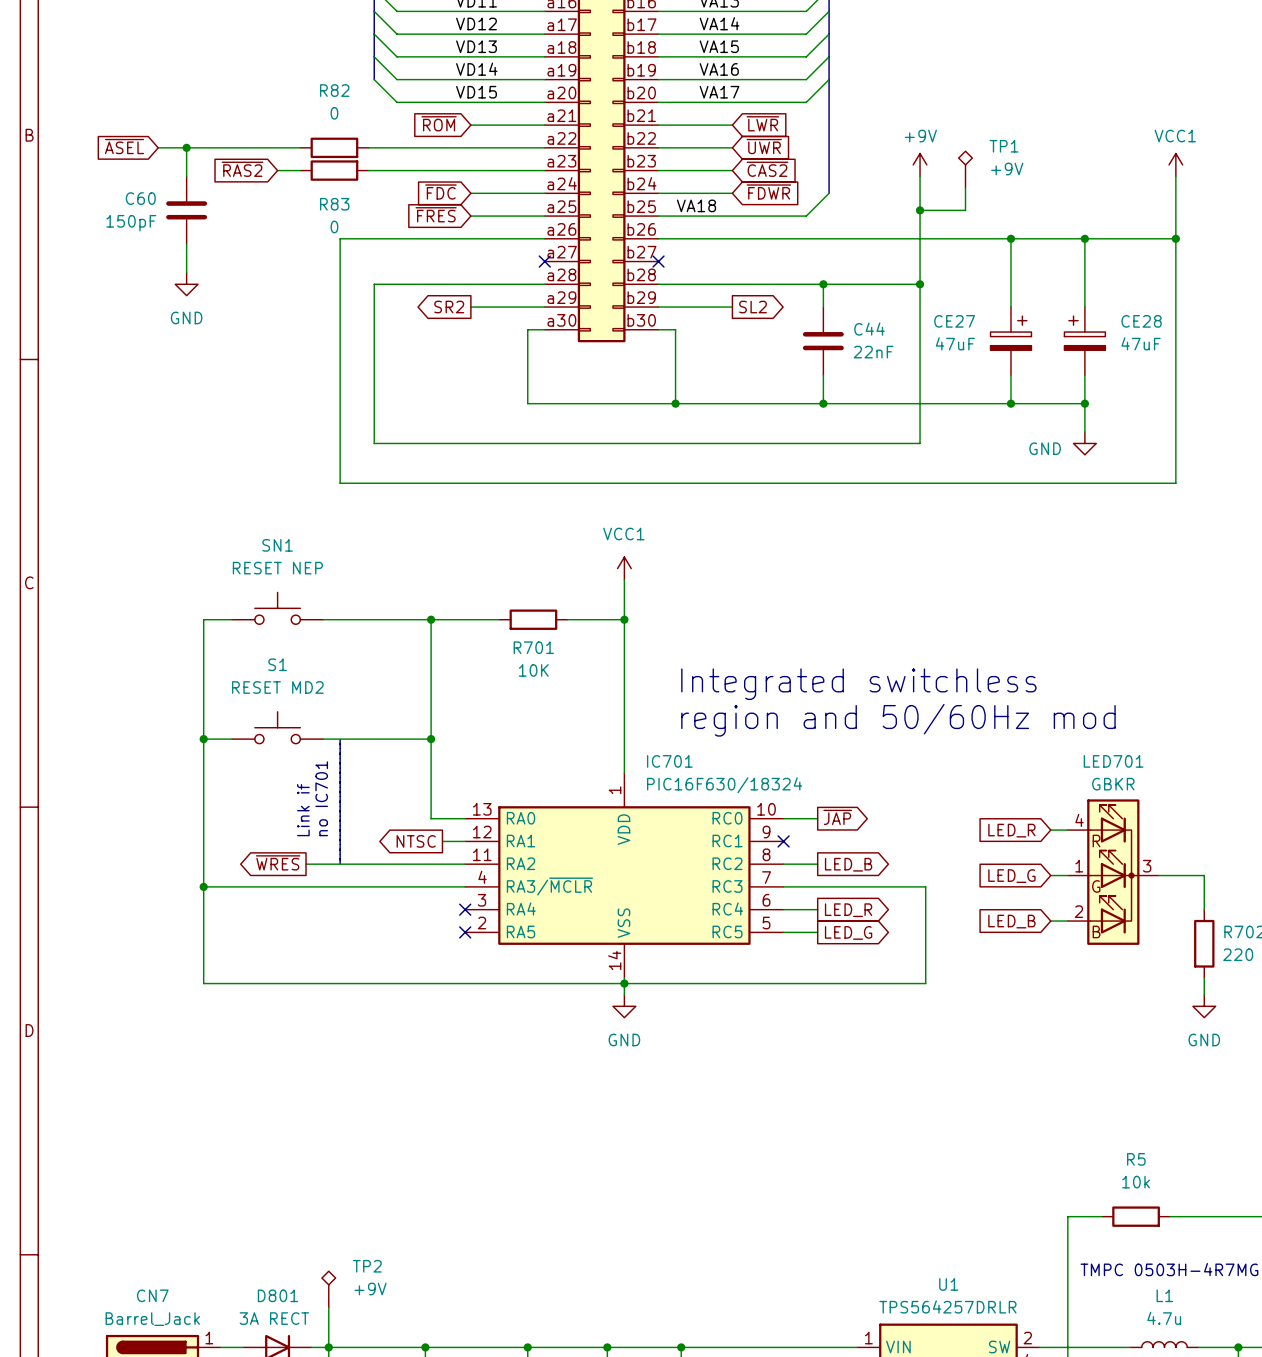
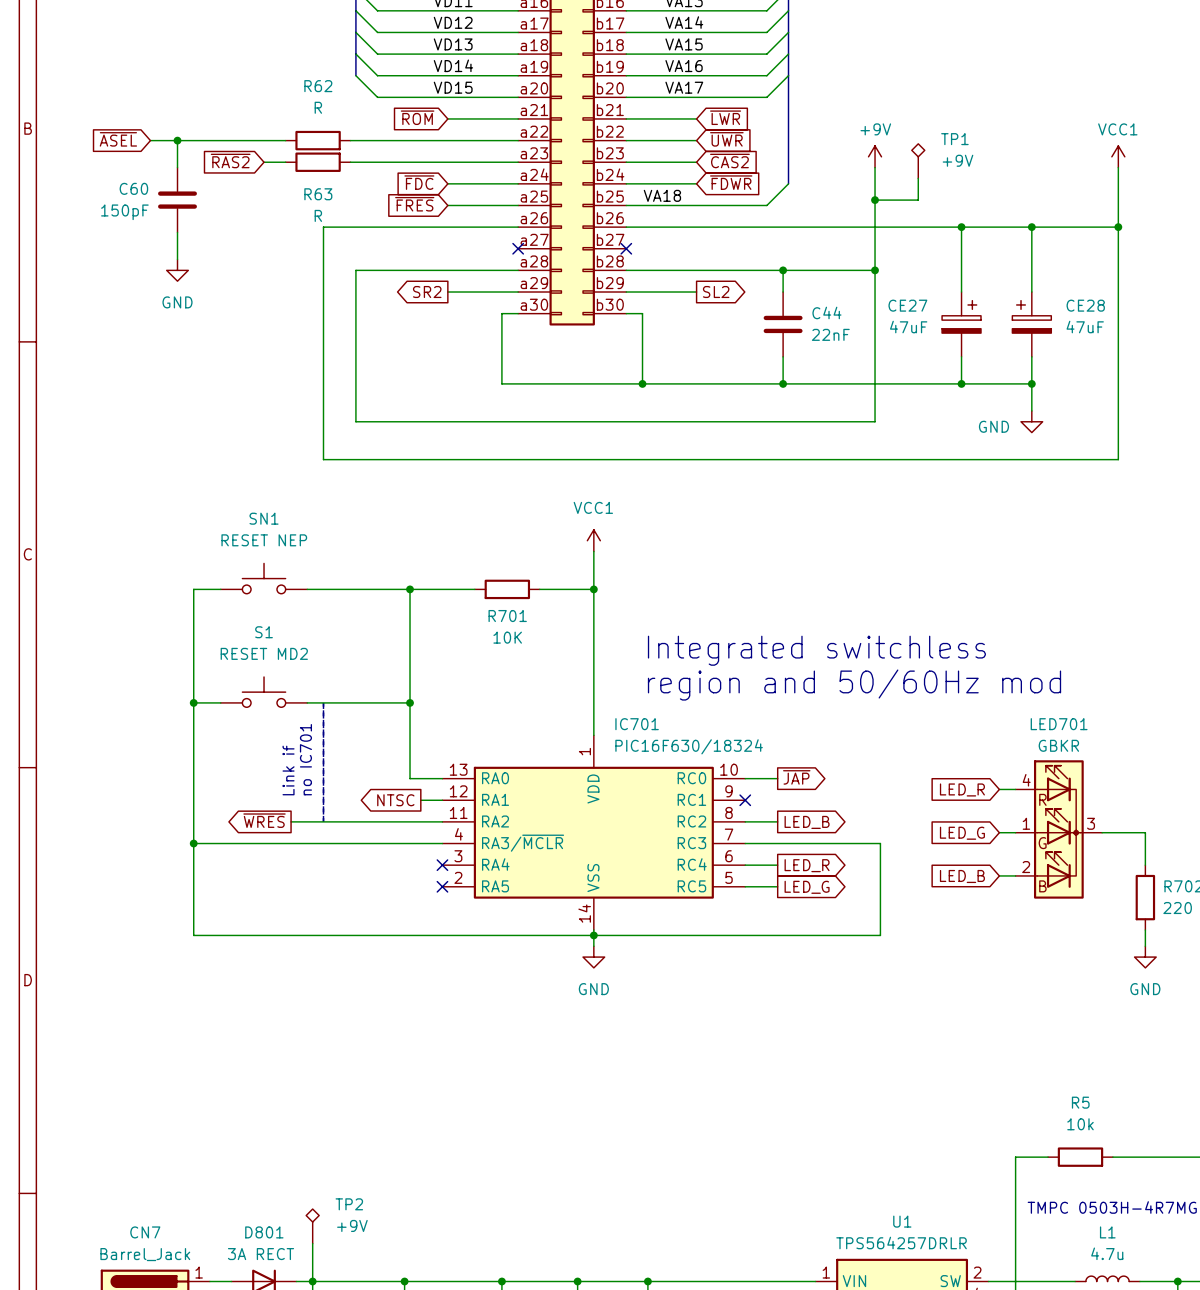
R82 name: R82 (334, 90) -> R62 (318, 86)
R82 value: 0 (334, 113) -> R (318, 107)
R83 name: R83 (334, 204) -> R63 (318, 194)
R83 value: 0 (334, 227) -> R (318, 215)

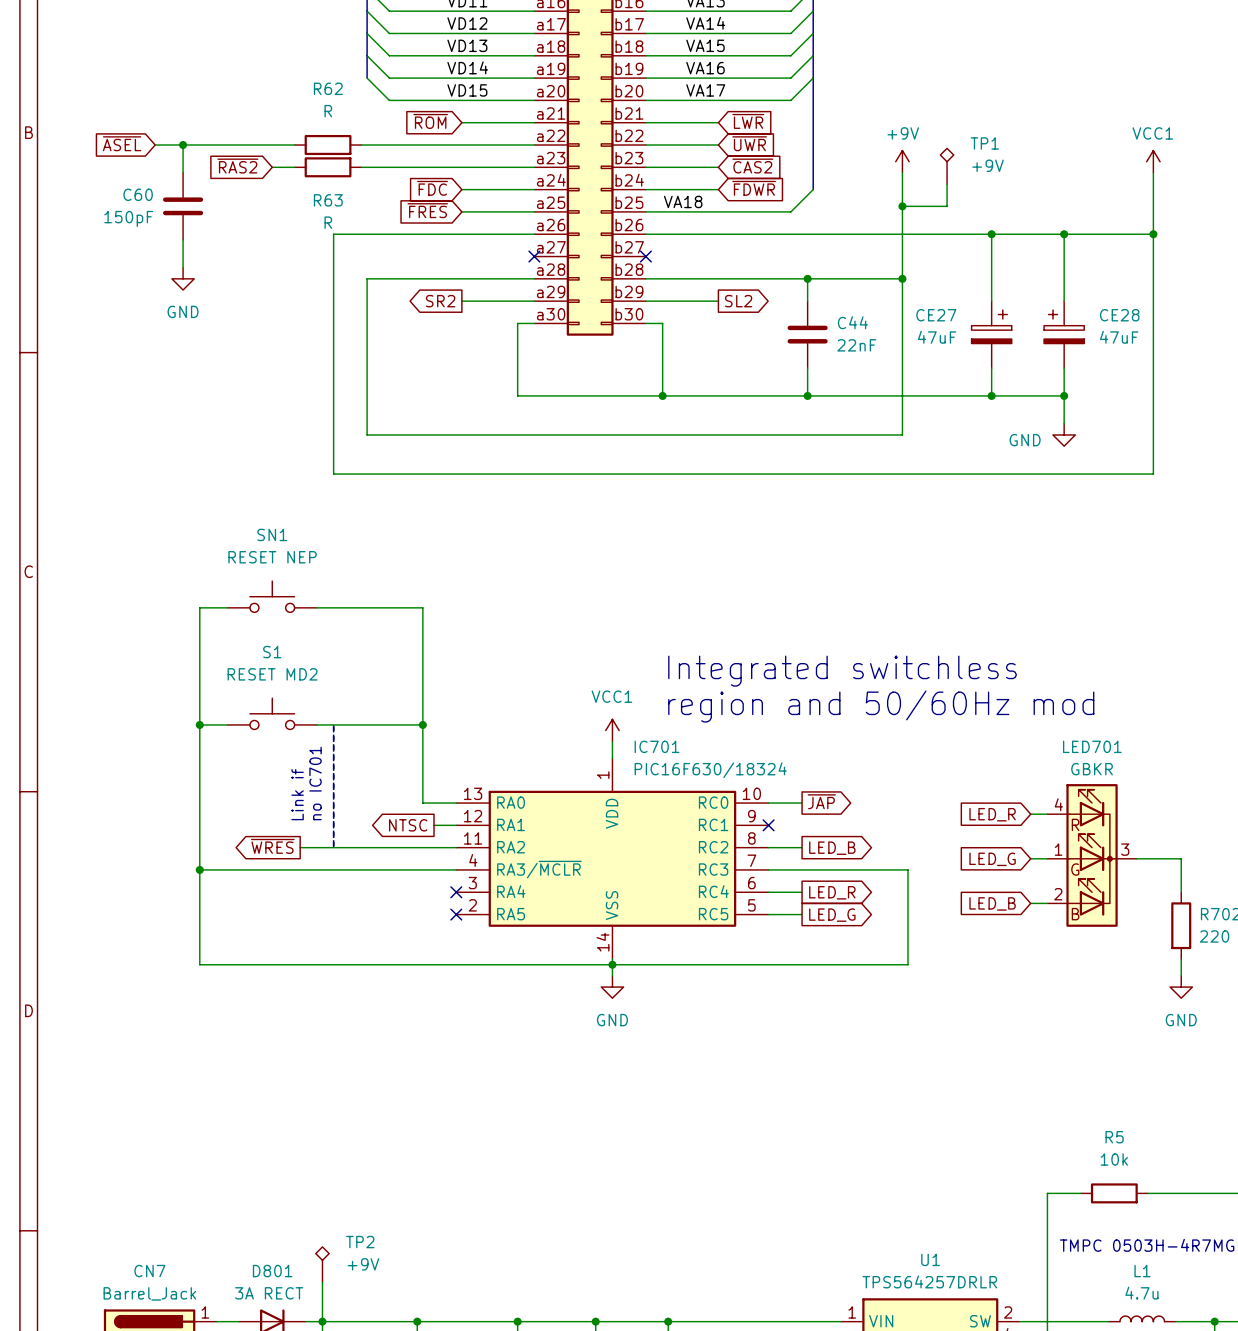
power symbol position: VCC1 (593, 540) -> VCC1 (612, 730)
wire: (593, 551) (593, 719) -> none
wire: (410, 589) (474, 589) -> none
junction: (410, 589) -> none
R701: 10K (507, 589) -> none
wire: (539, 589) (593, 589) -> none
junction: (593, 589) -> none

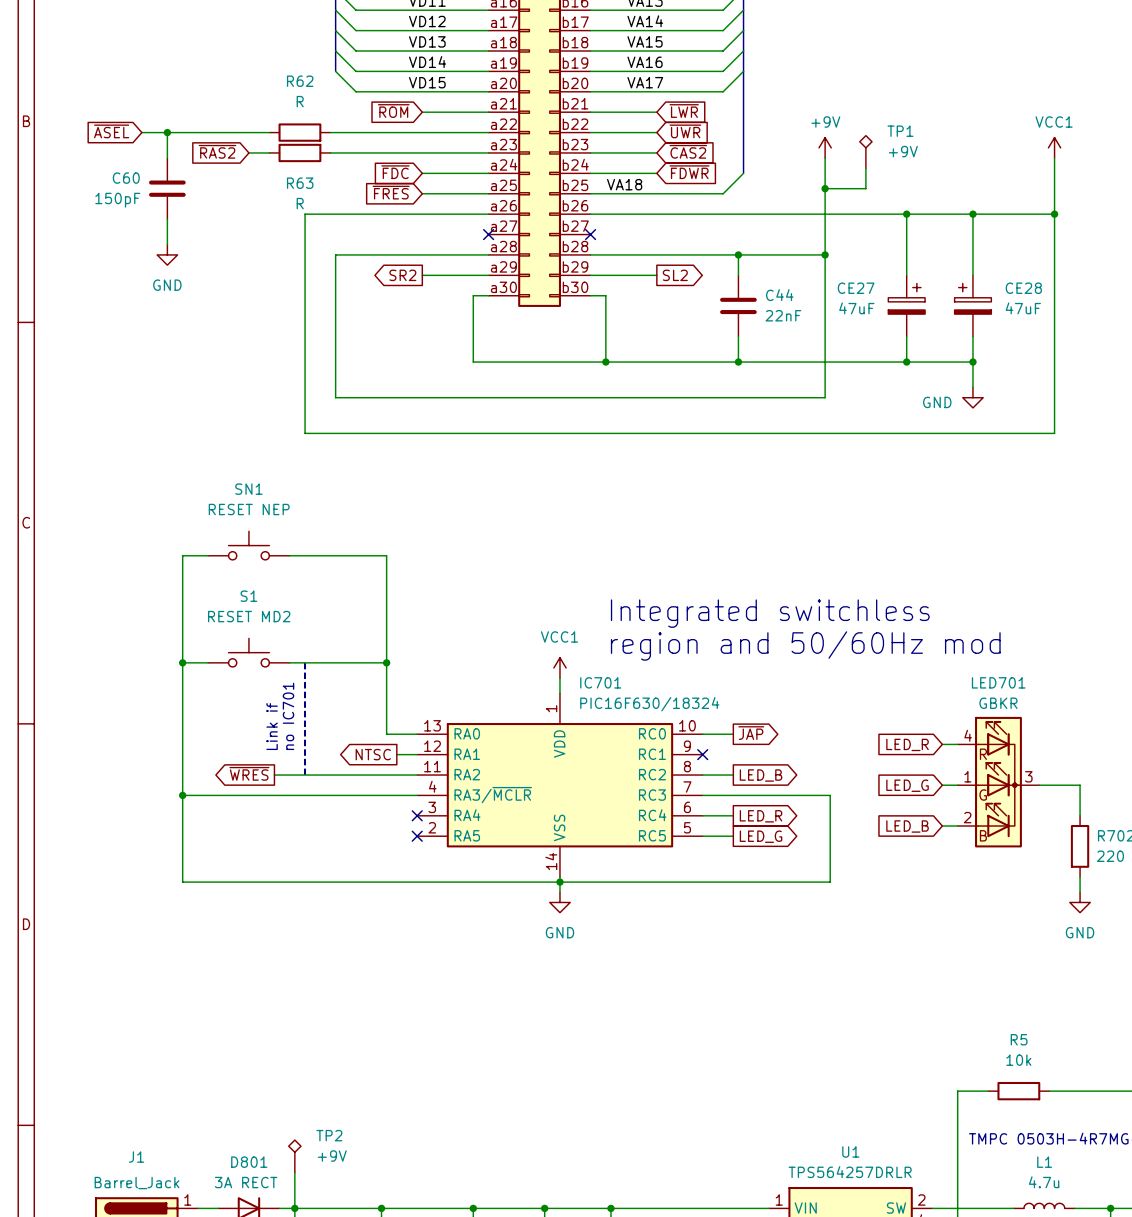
CN7 name: CN7 (149, 1271) -> J1 (136, 1157)

